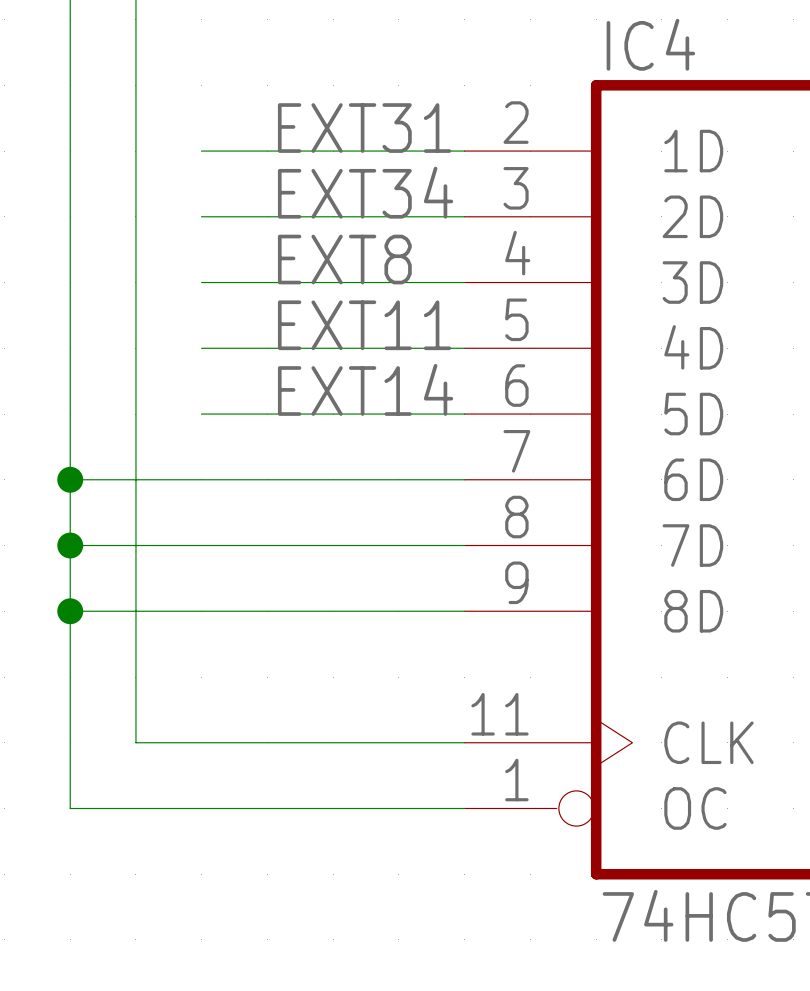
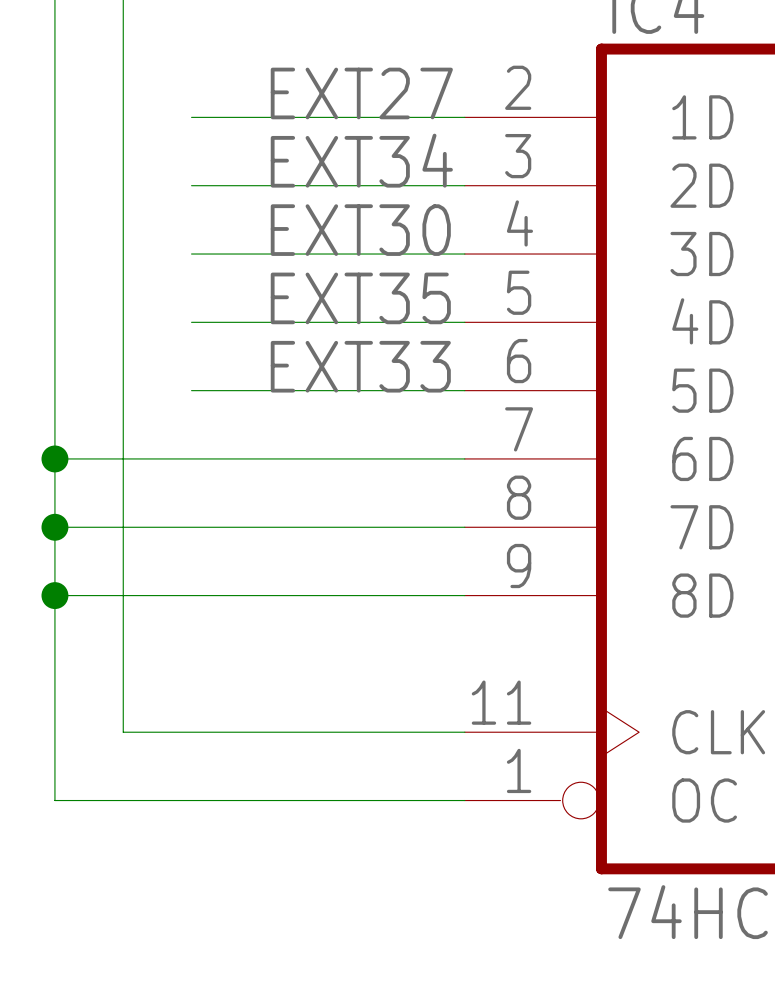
label: EXT31 (364, 128) -> EXT27 (361, 93)
label: EXT8 (344, 259) -> EXT30 (360, 230)
label: EXT11 (364, 325) -> EXT35 (360, 298)
label: EXT14 (365, 389) -> EXT33 (360, 366)

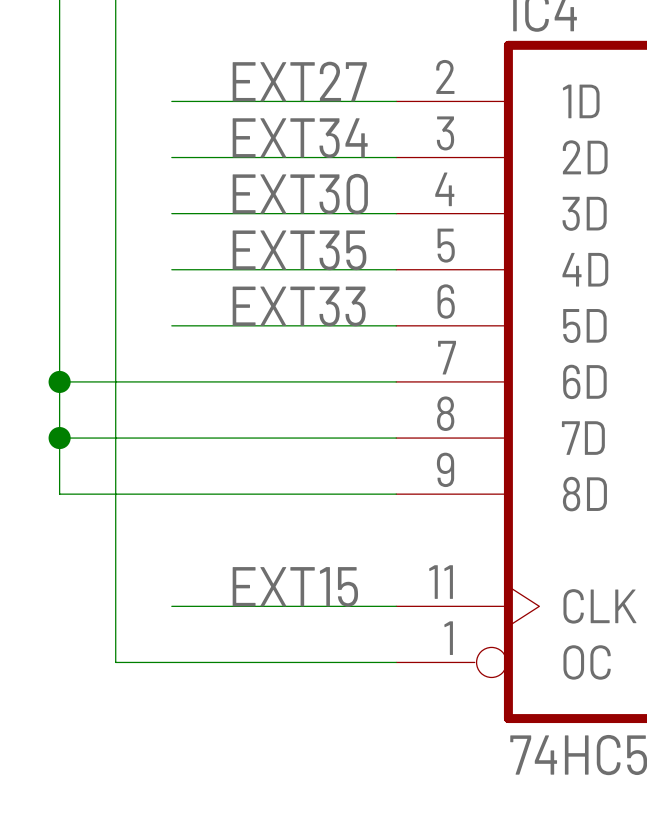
wire: (54, 595) (54, 800) (123, 800) -> none
junction: (54, 595) -> none
label: none -> EXT15 (295, 586)
wire: (123, 732) (191, 732) -> (115, 606) (115, 662)

